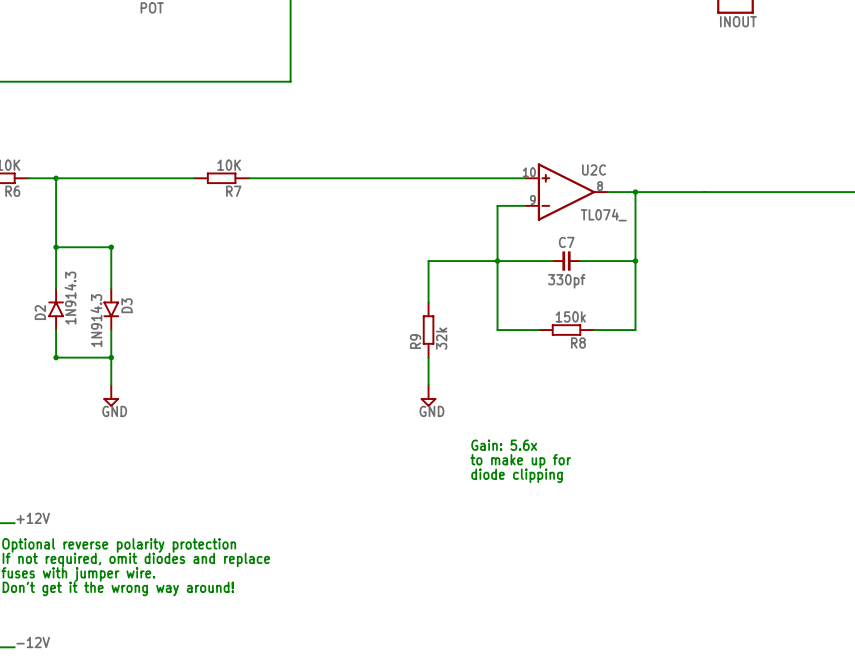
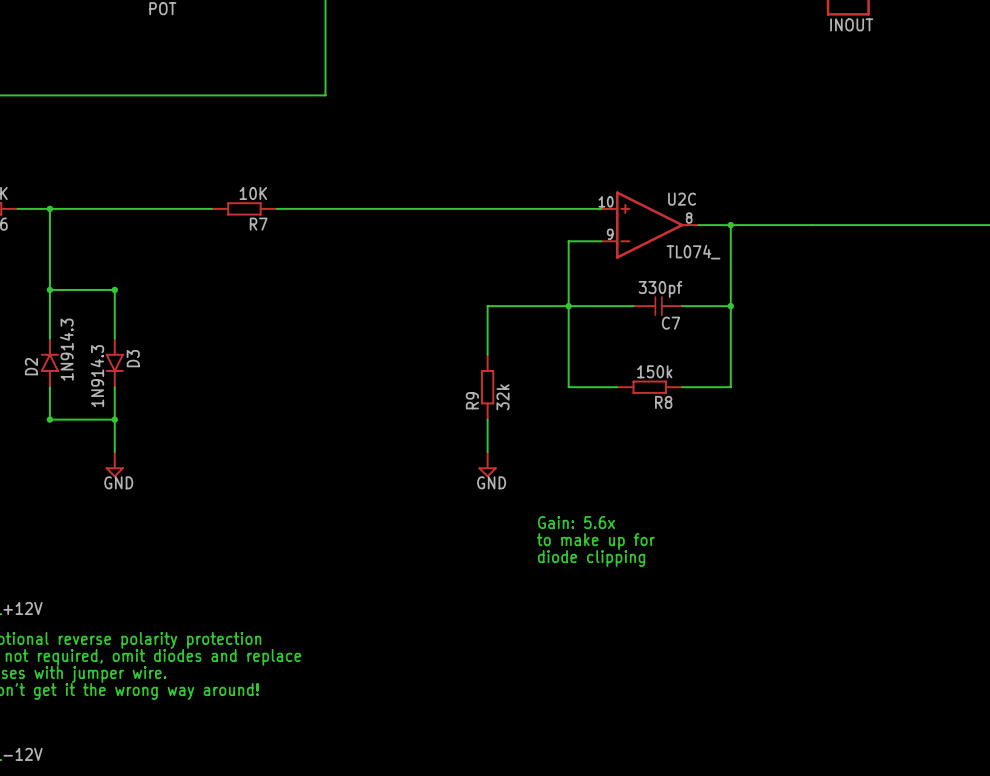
C7 name position: C7 (566, 242) -> C7 (671, 323)
C7 symbol: [552, 251, 581, 271] -> [633, 296, 683, 316]
C7 value position: 330pf (566, 281) -> 330pf (660, 289)

